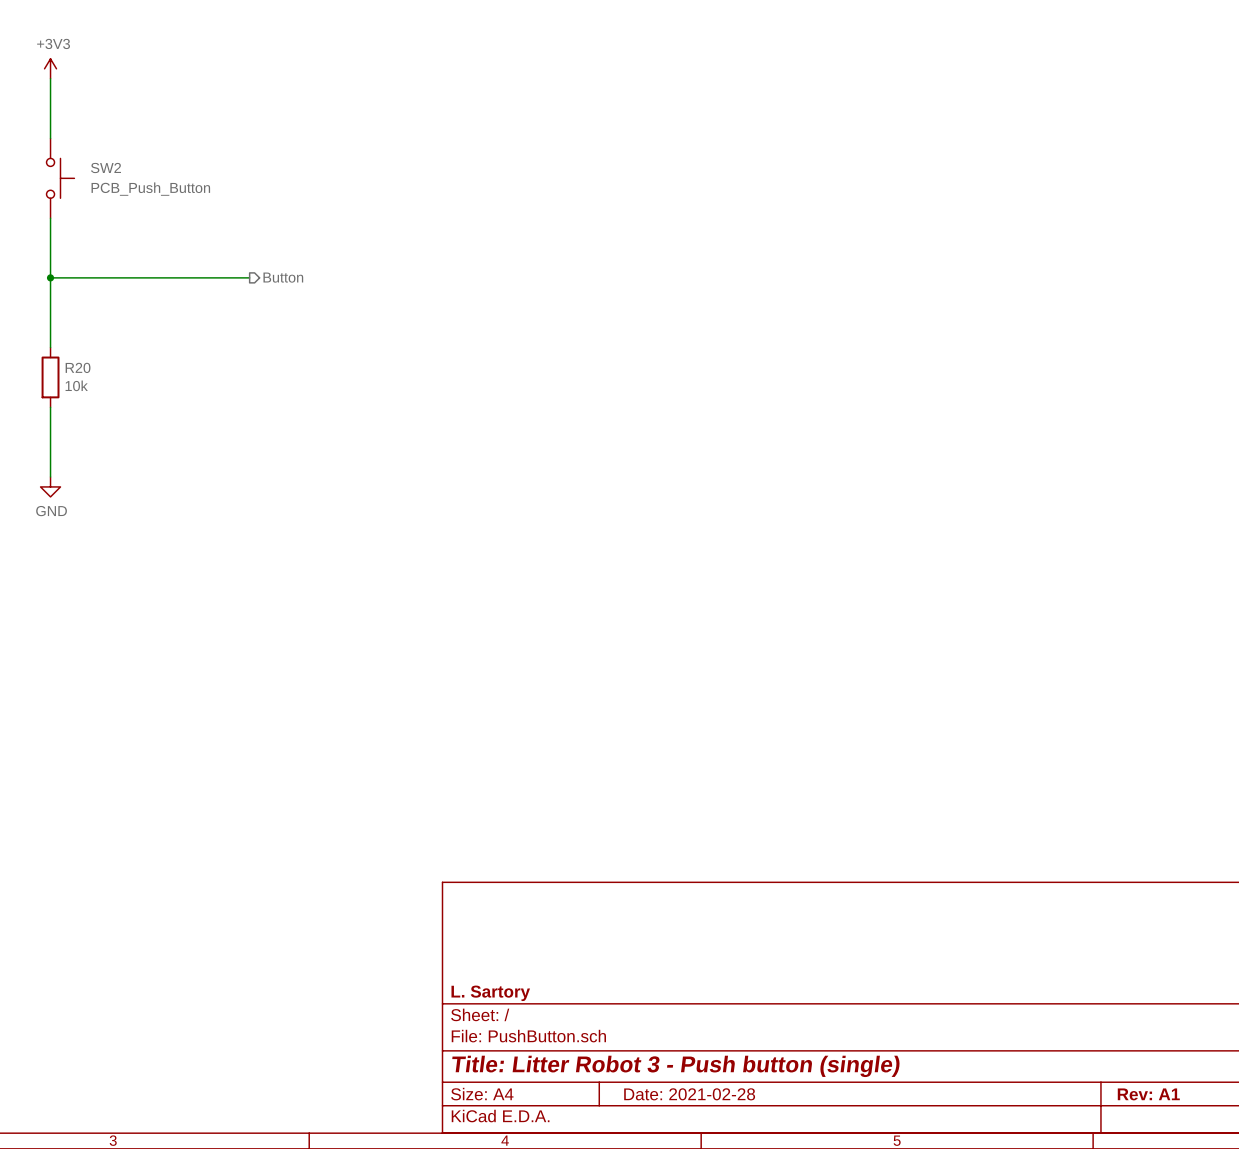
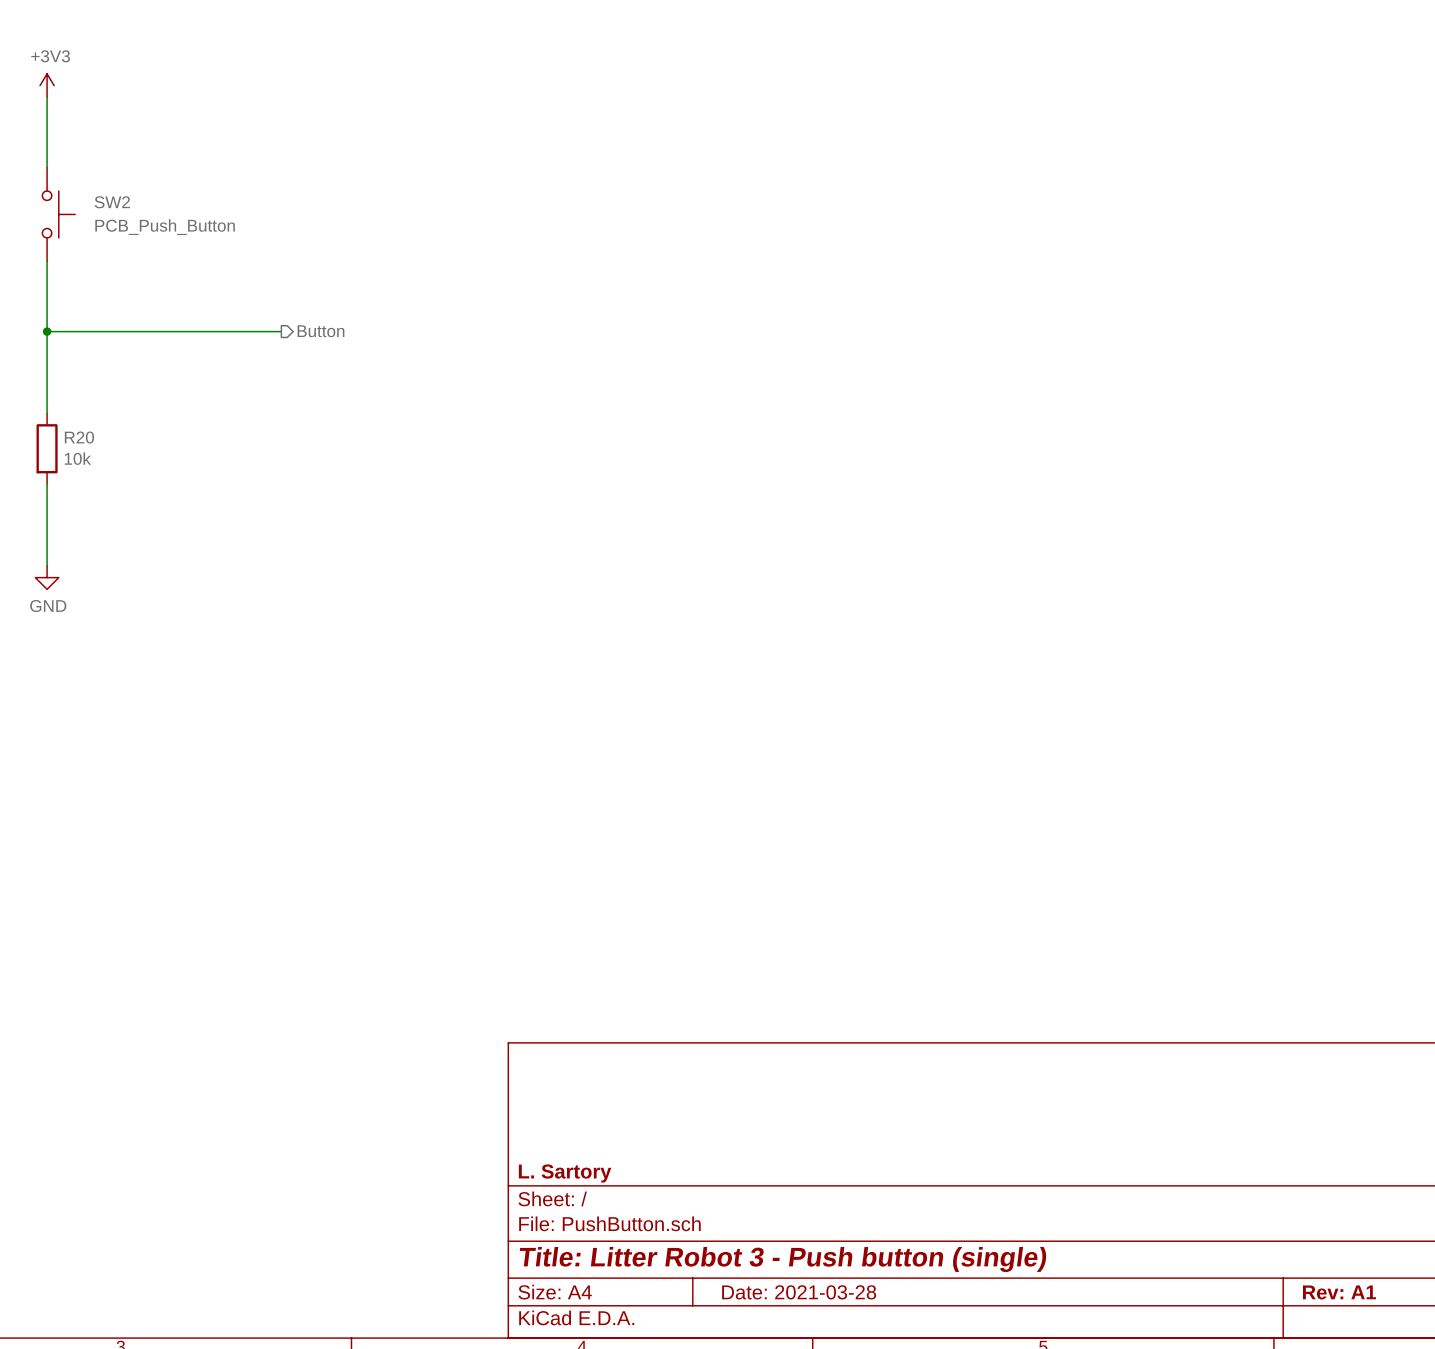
title block: Date: 2021-02-28 (689, 1094) -> Date: 2021-03-28 (799, 1292)

